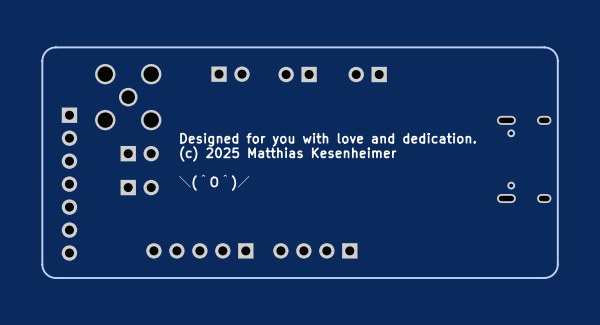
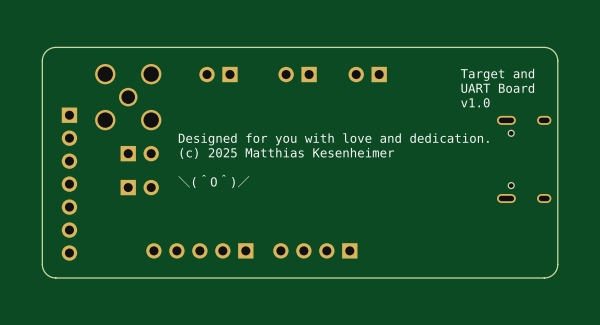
part rotation: 0° (230, 74) -> 180° (218, 74)
text: none -> Target and (497, 74)
text: none -> UART Board (497, 88)
text: none -> v1.0 (475, 102)

